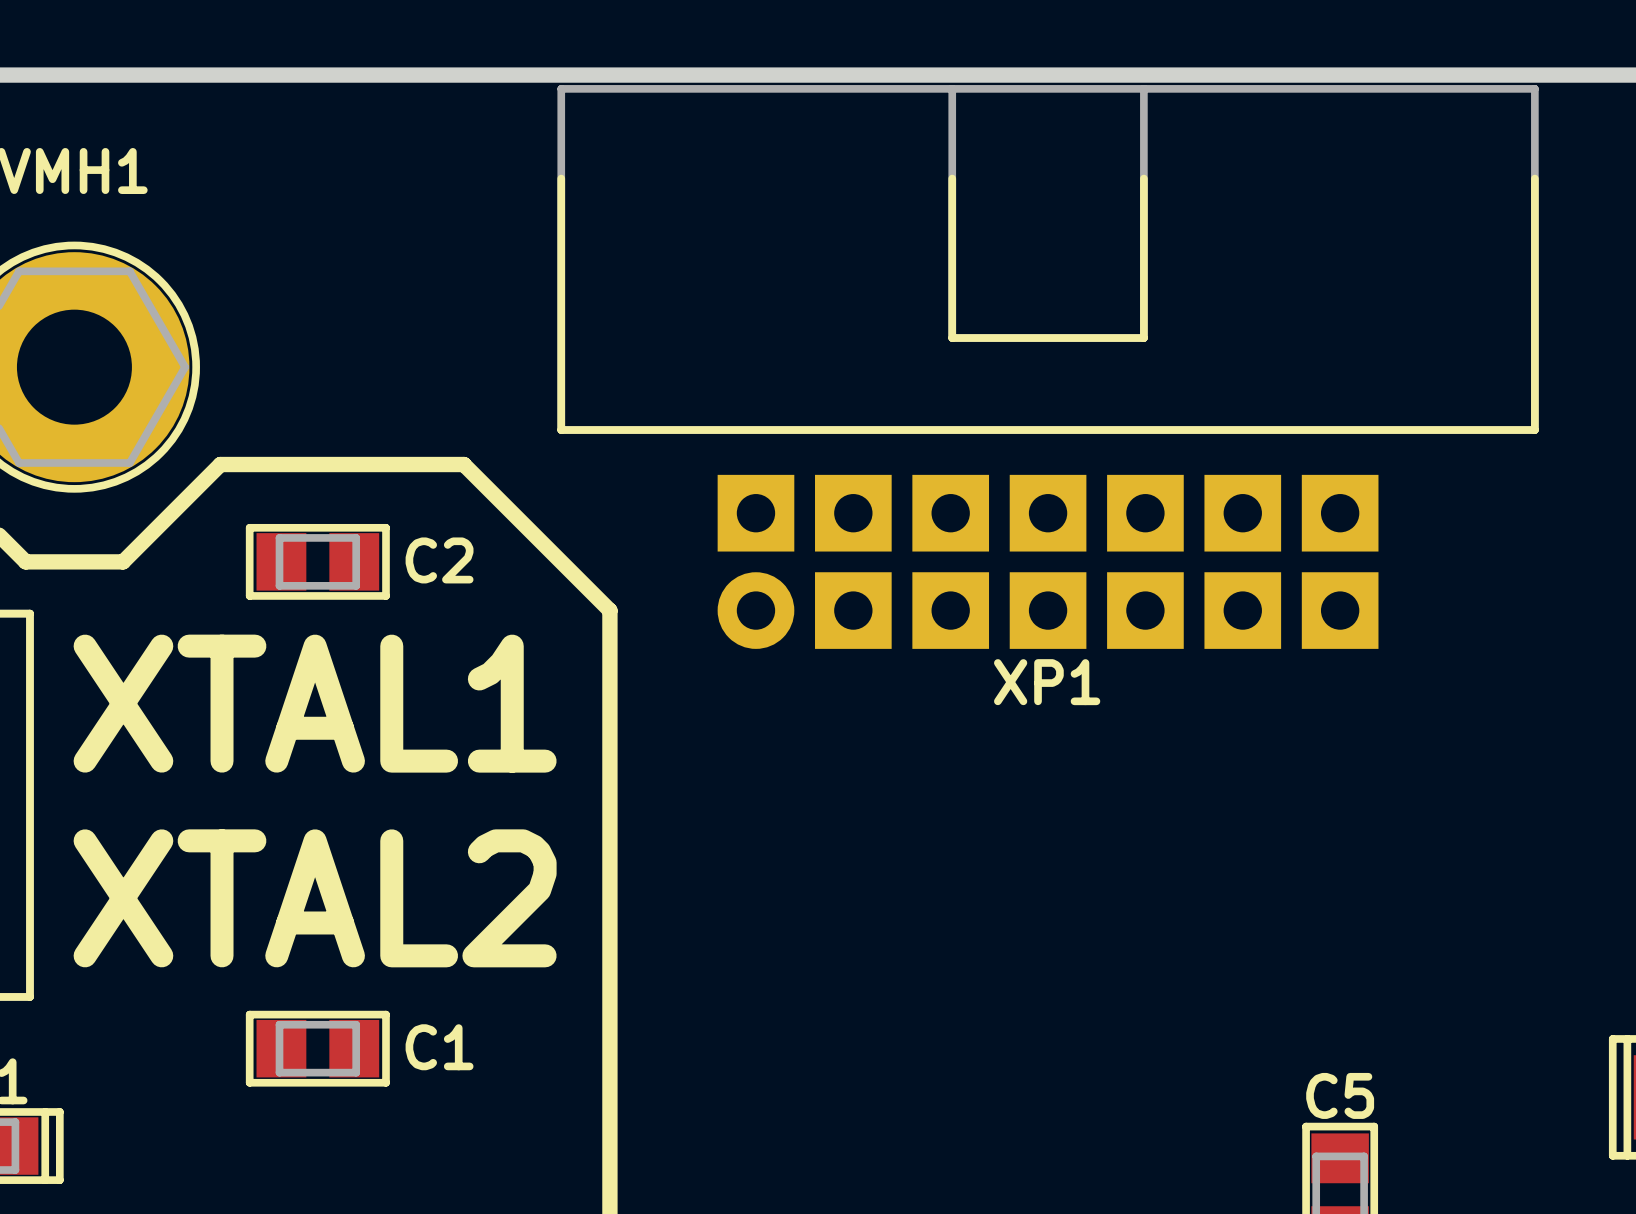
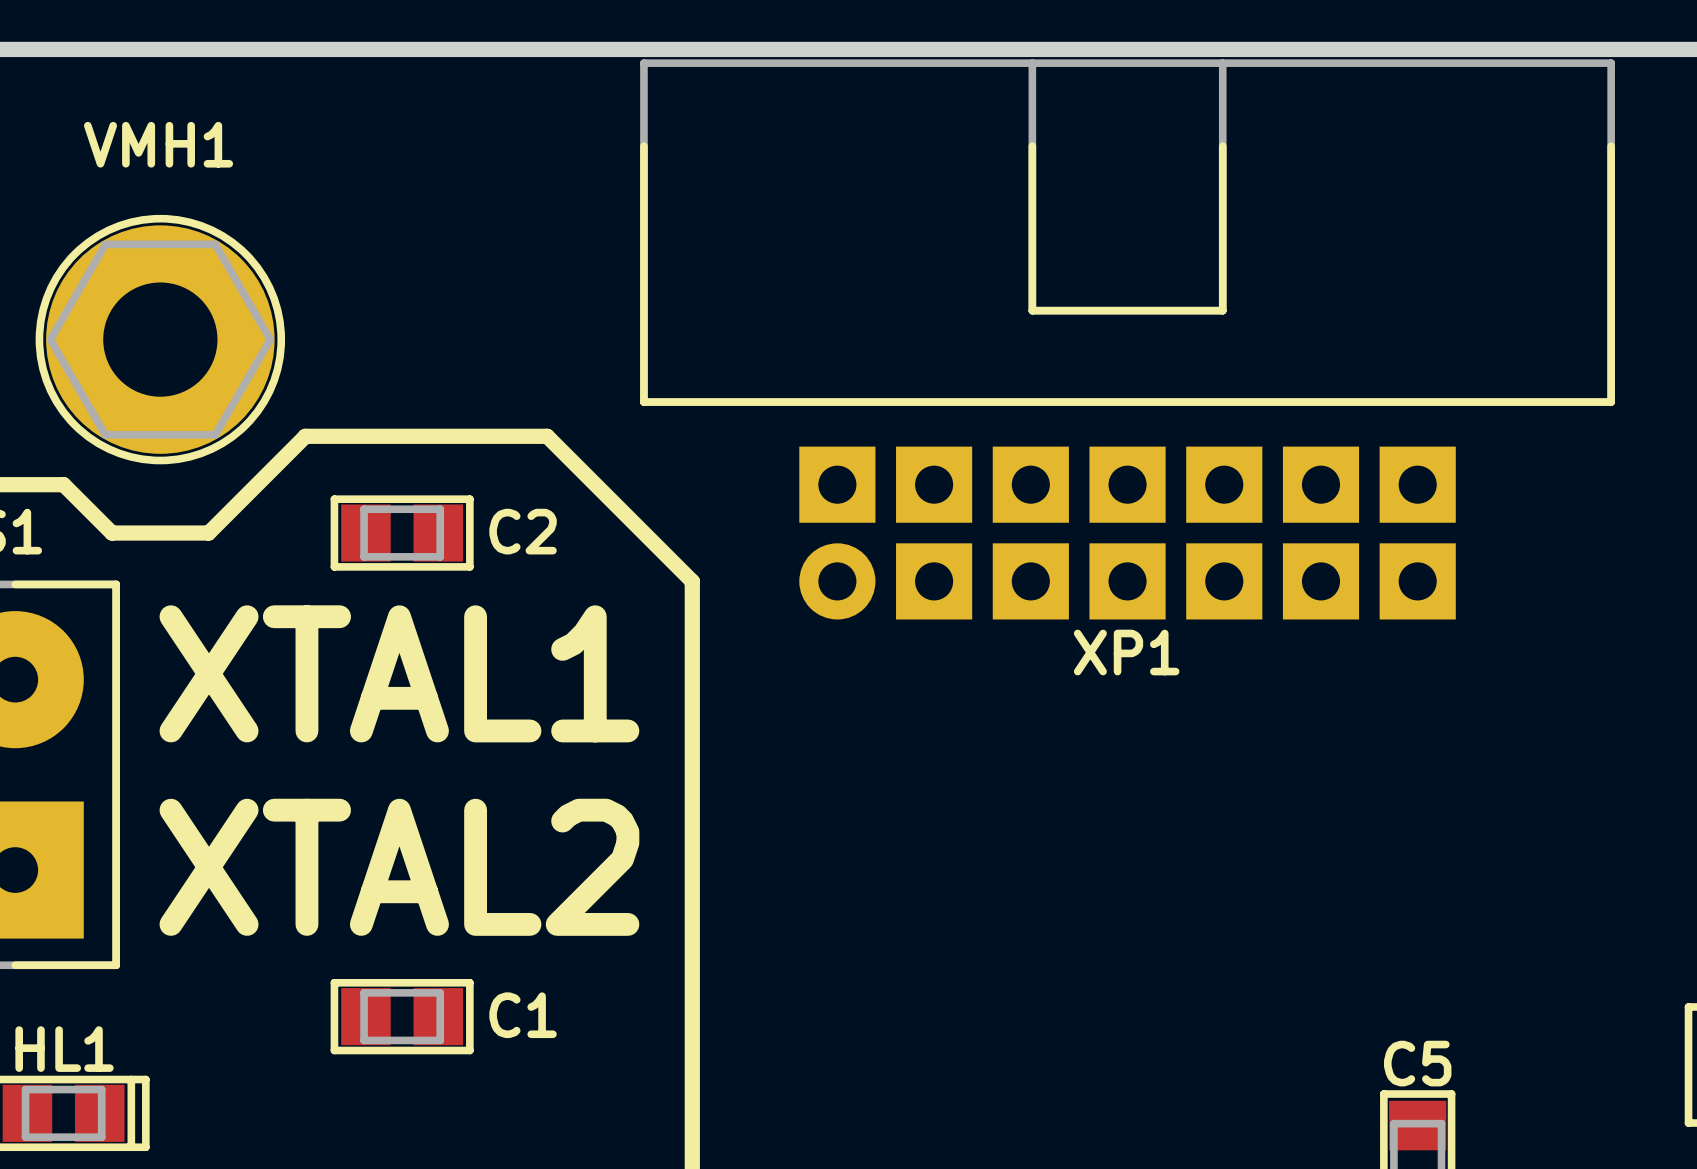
XP1 footprint: [557, 85, 1539, 649] -> [640, 59, 1615, 620]

